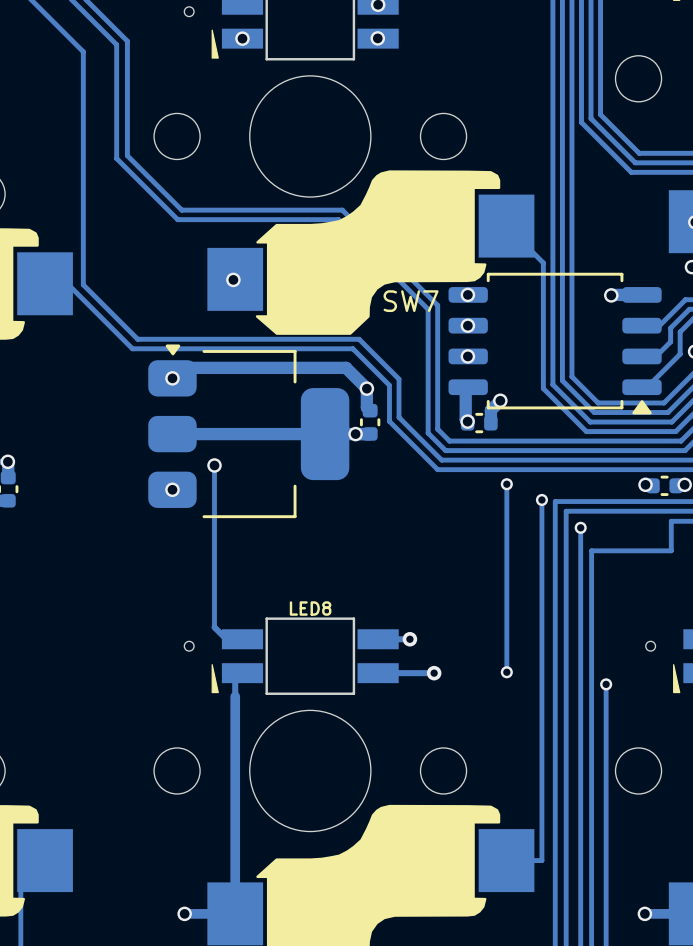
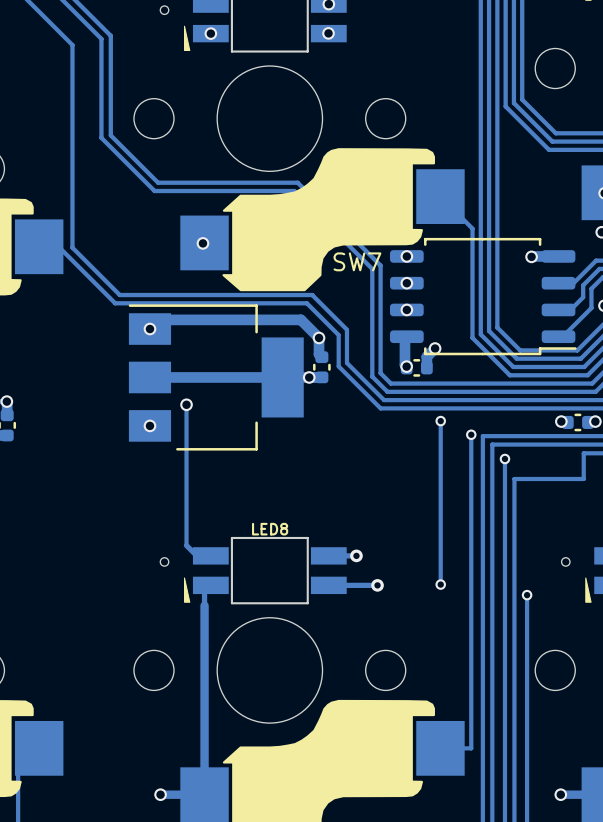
part footprint: [448, 272, 662, 415] -> [390, 237, 577, 356]
part footprint: [148, 344, 350, 519] -> [128, 304, 304, 451]

